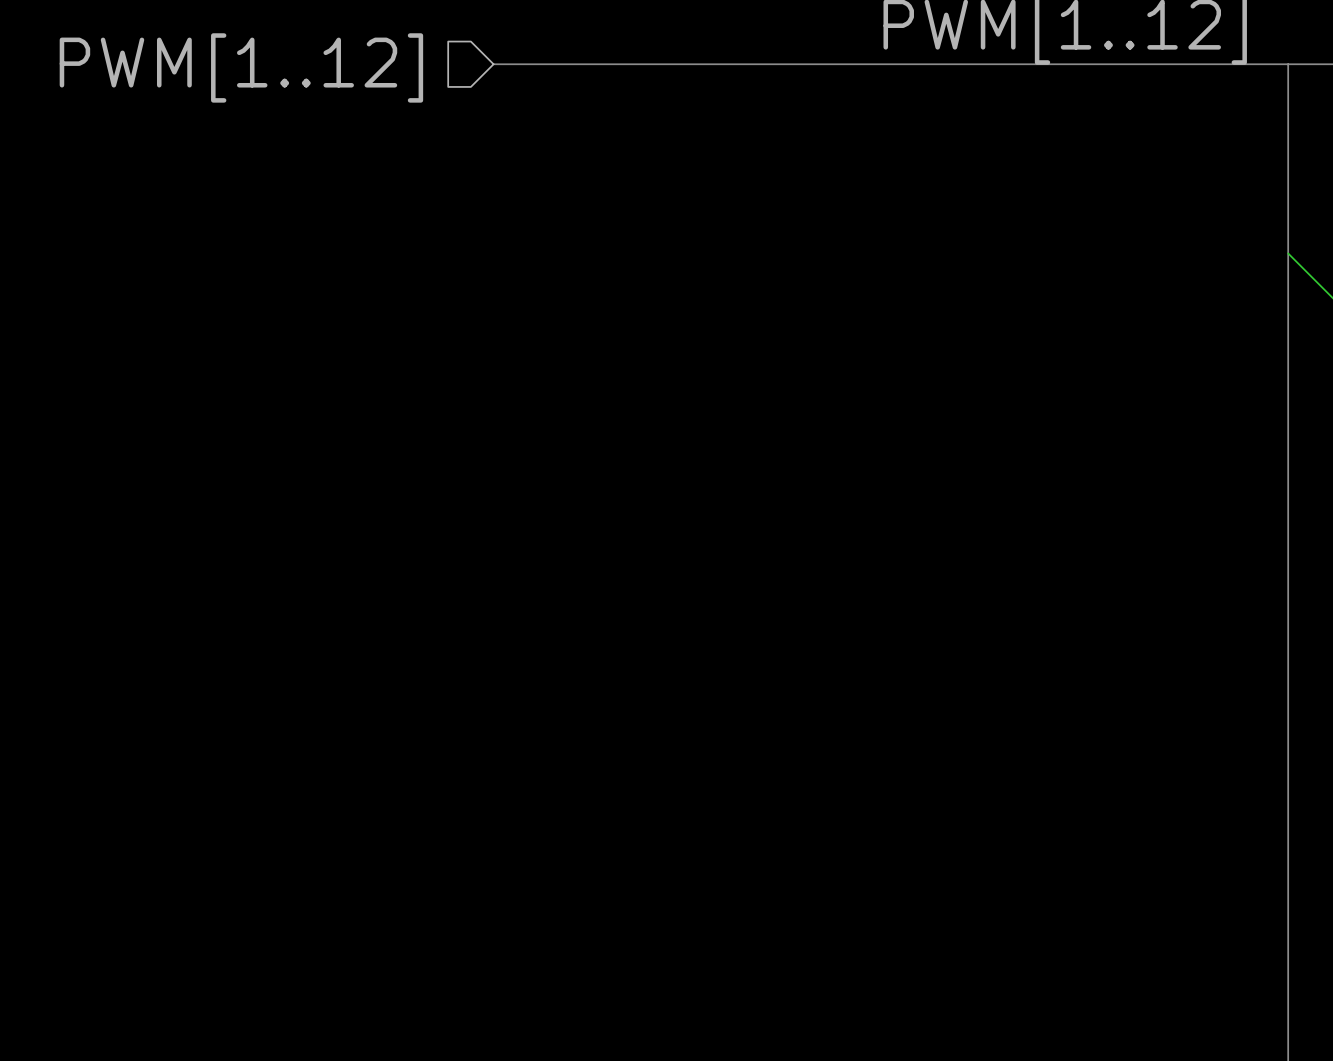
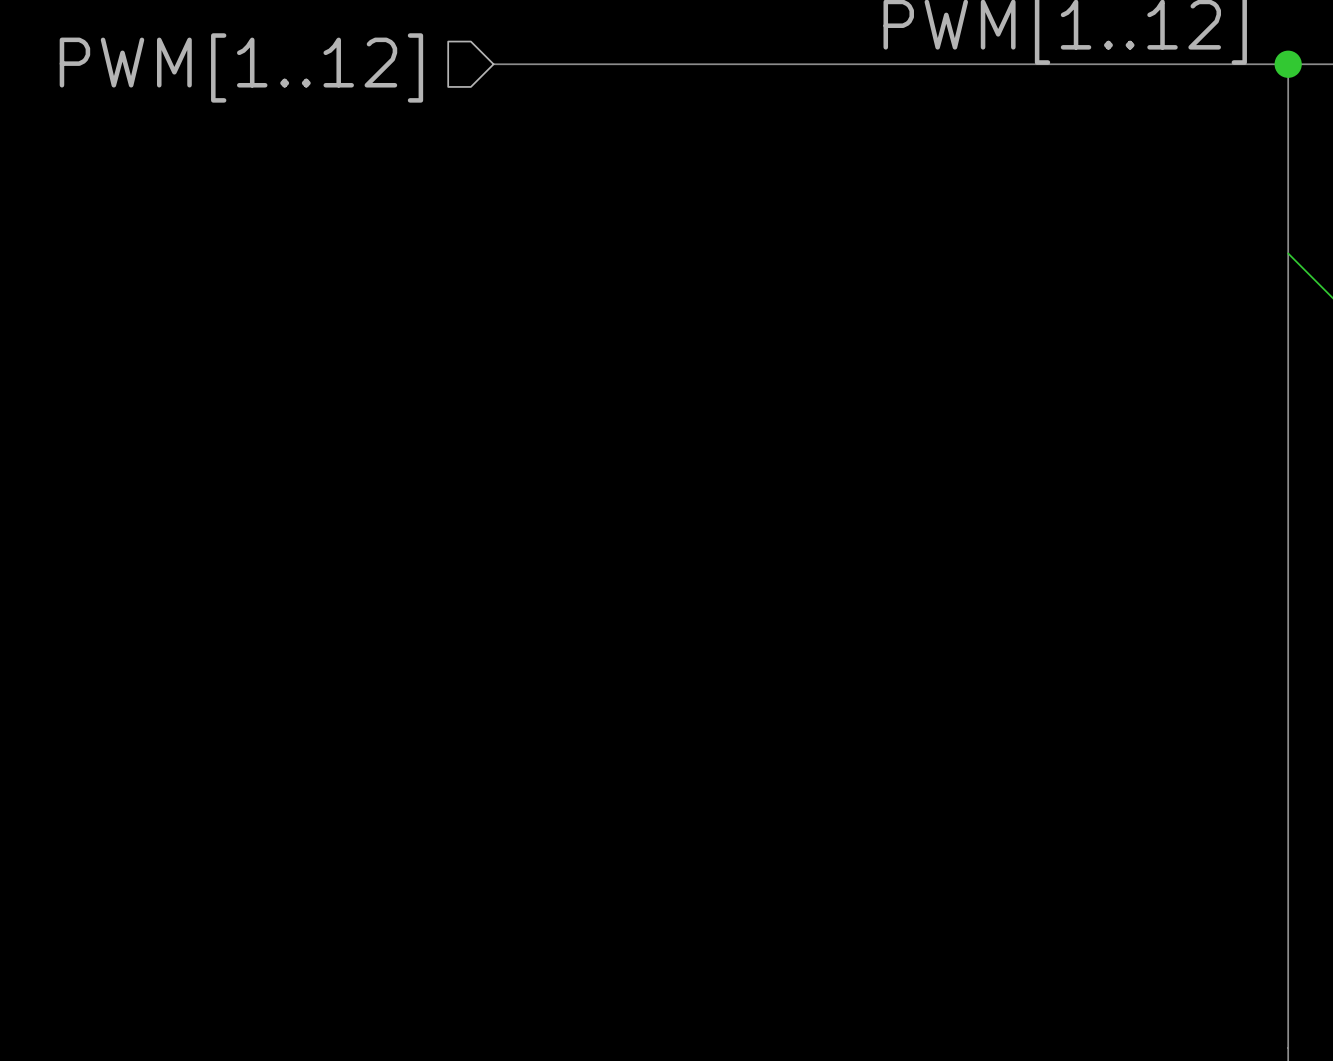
junction: none -> (1288, 64)

